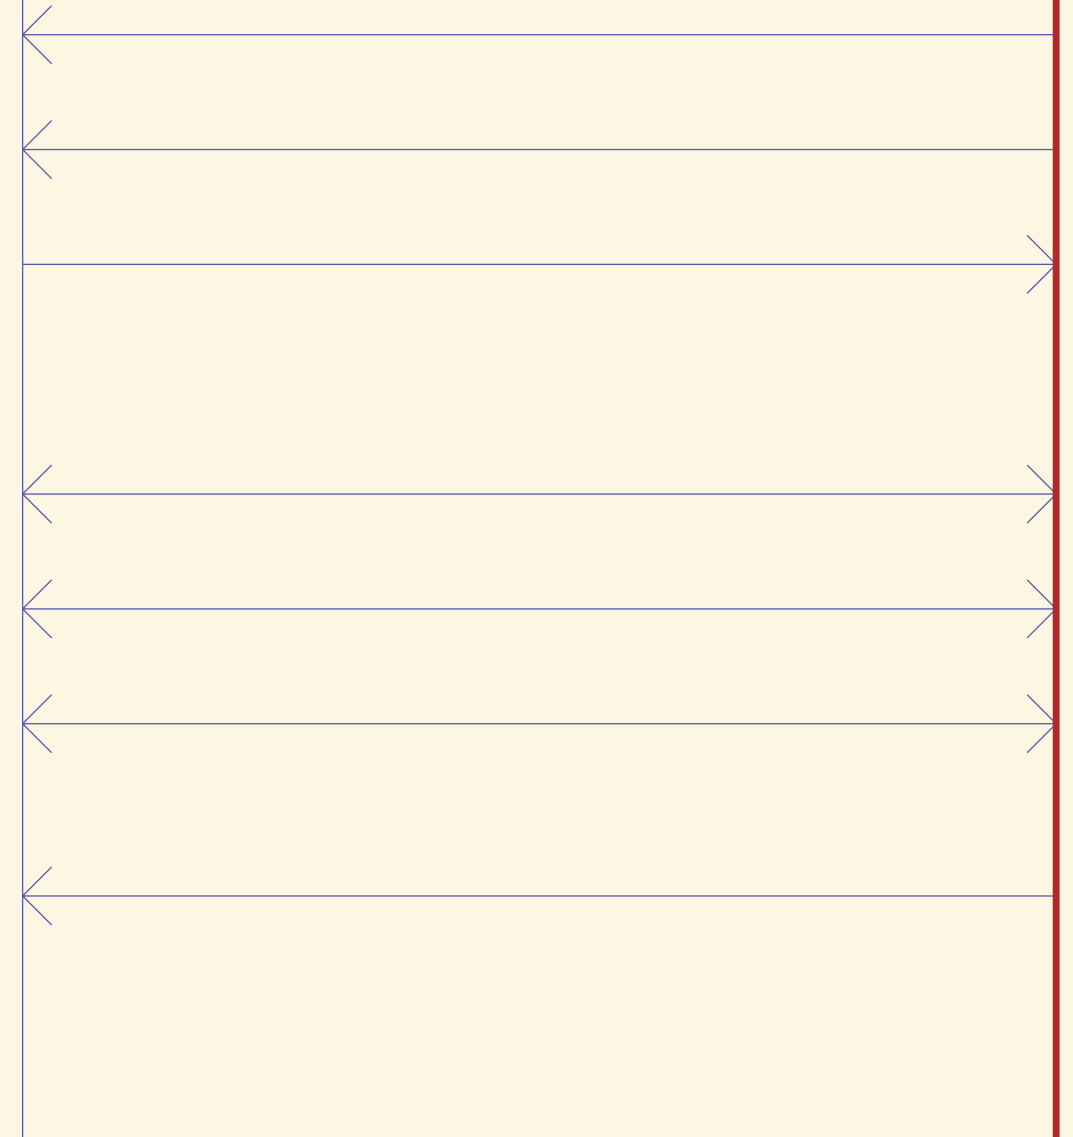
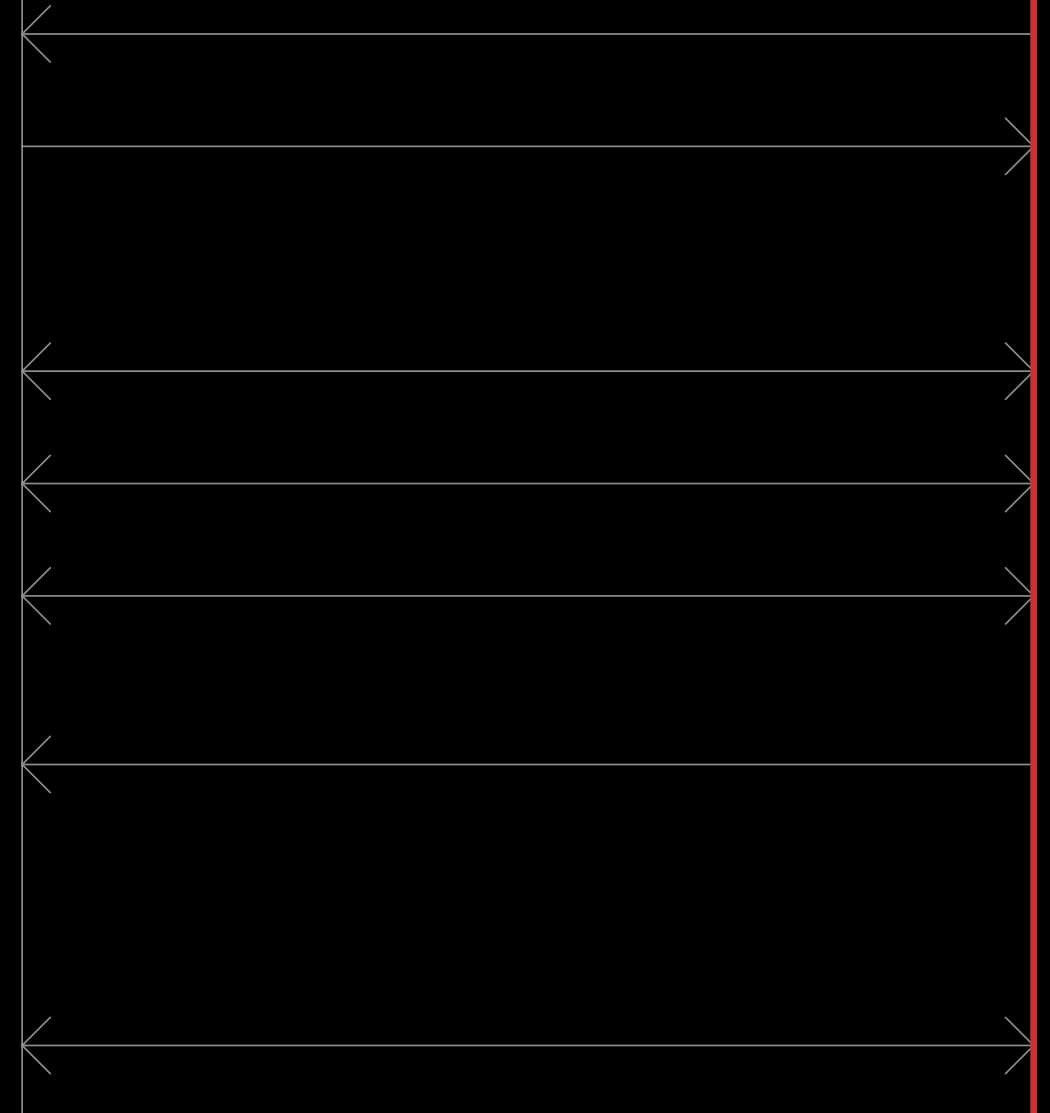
line: (51, 120) (22, 149) (51, 178) -> none
line: none -> (1005, 118) (1033, 146) (1005, 174)
line: (1027, 235) (1056, 264) -> (1005, 343) (1033, 371)
line: (22, 264) (1056, 264) -> (22, 371) (1033, 371)
line: (1056, 264) (1027, 293) -> (1033, 371) (1005, 399)
line: none -> (22, 371) (50, 399)
line: (51, 695) (22, 723) -> (50, 1017) (22, 1045)
line: (1027, 695) (1056, 723) -> (1005, 1017) (1033, 1045)
line: (22, 723) (51, 752) -> (22, 764) (50, 736)
line: (22, 723) (1056, 723) -> (22, 1045) (1033, 1045)
line: (1056, 723) (1027, 752) -> (1033, 1045) (1005, 1073)
line: (51, 867) (22, 895) -> (50, 343) (22, 371)
line: (22, 895) (1056, 895) -> (22, 764) (1033, 764)
line: (22, 895) (51, 924) -> (22, 764) (50, 792)
line: none -> (22, 1045) (50, 1073)

